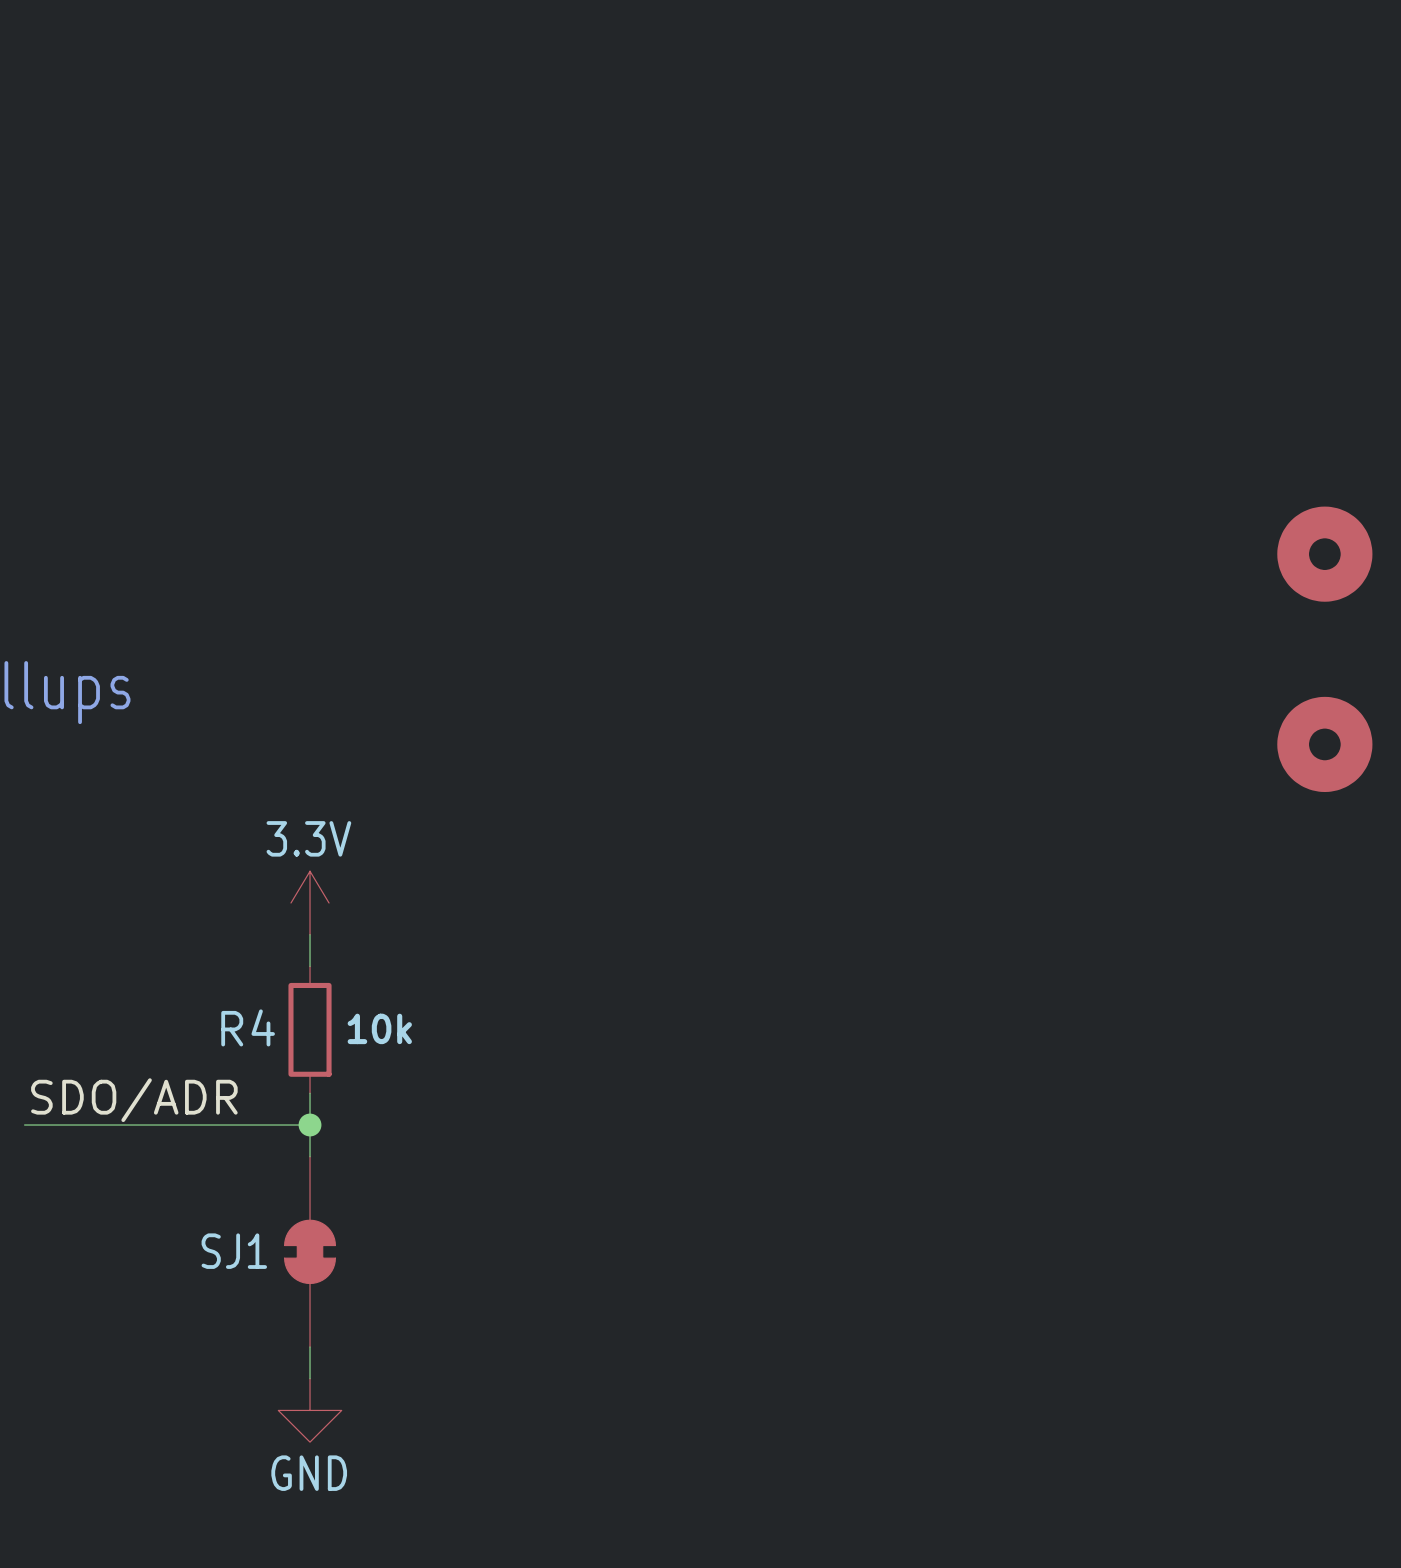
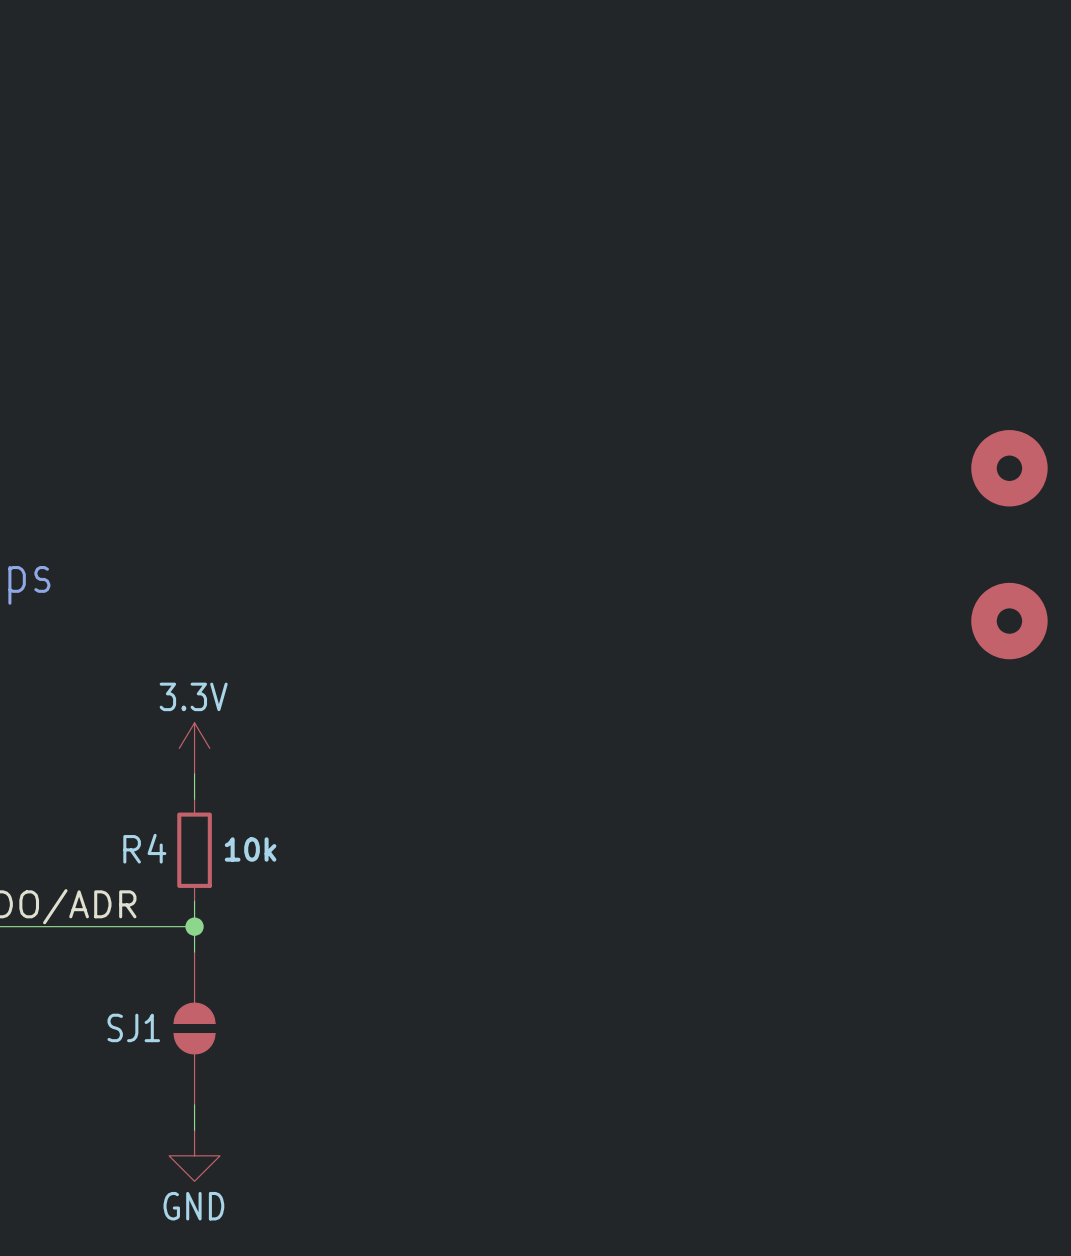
SJ1 symbol: [284, 1156, 336, 1348] -> [174, 952, 215, 1105]

